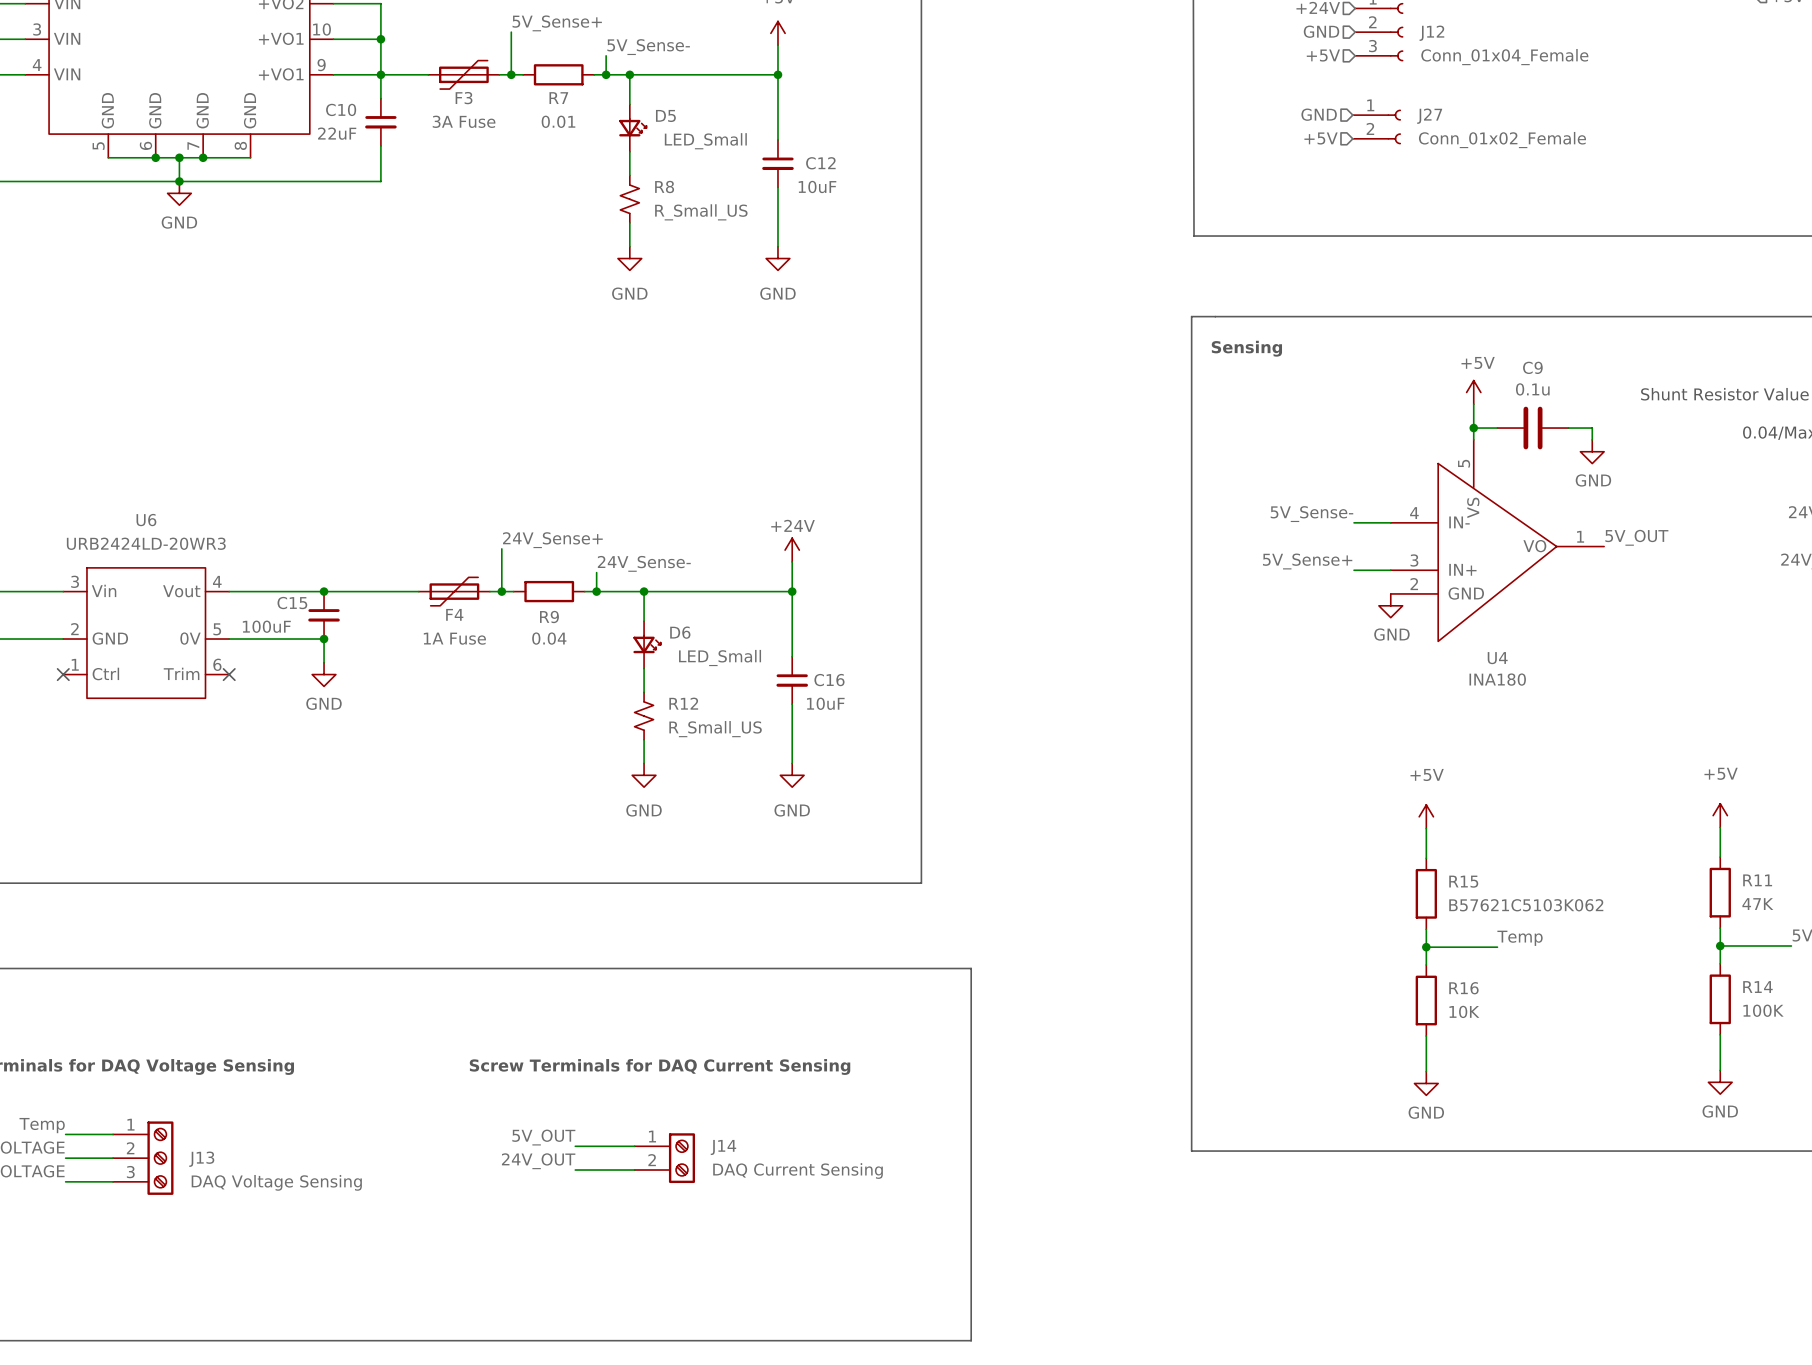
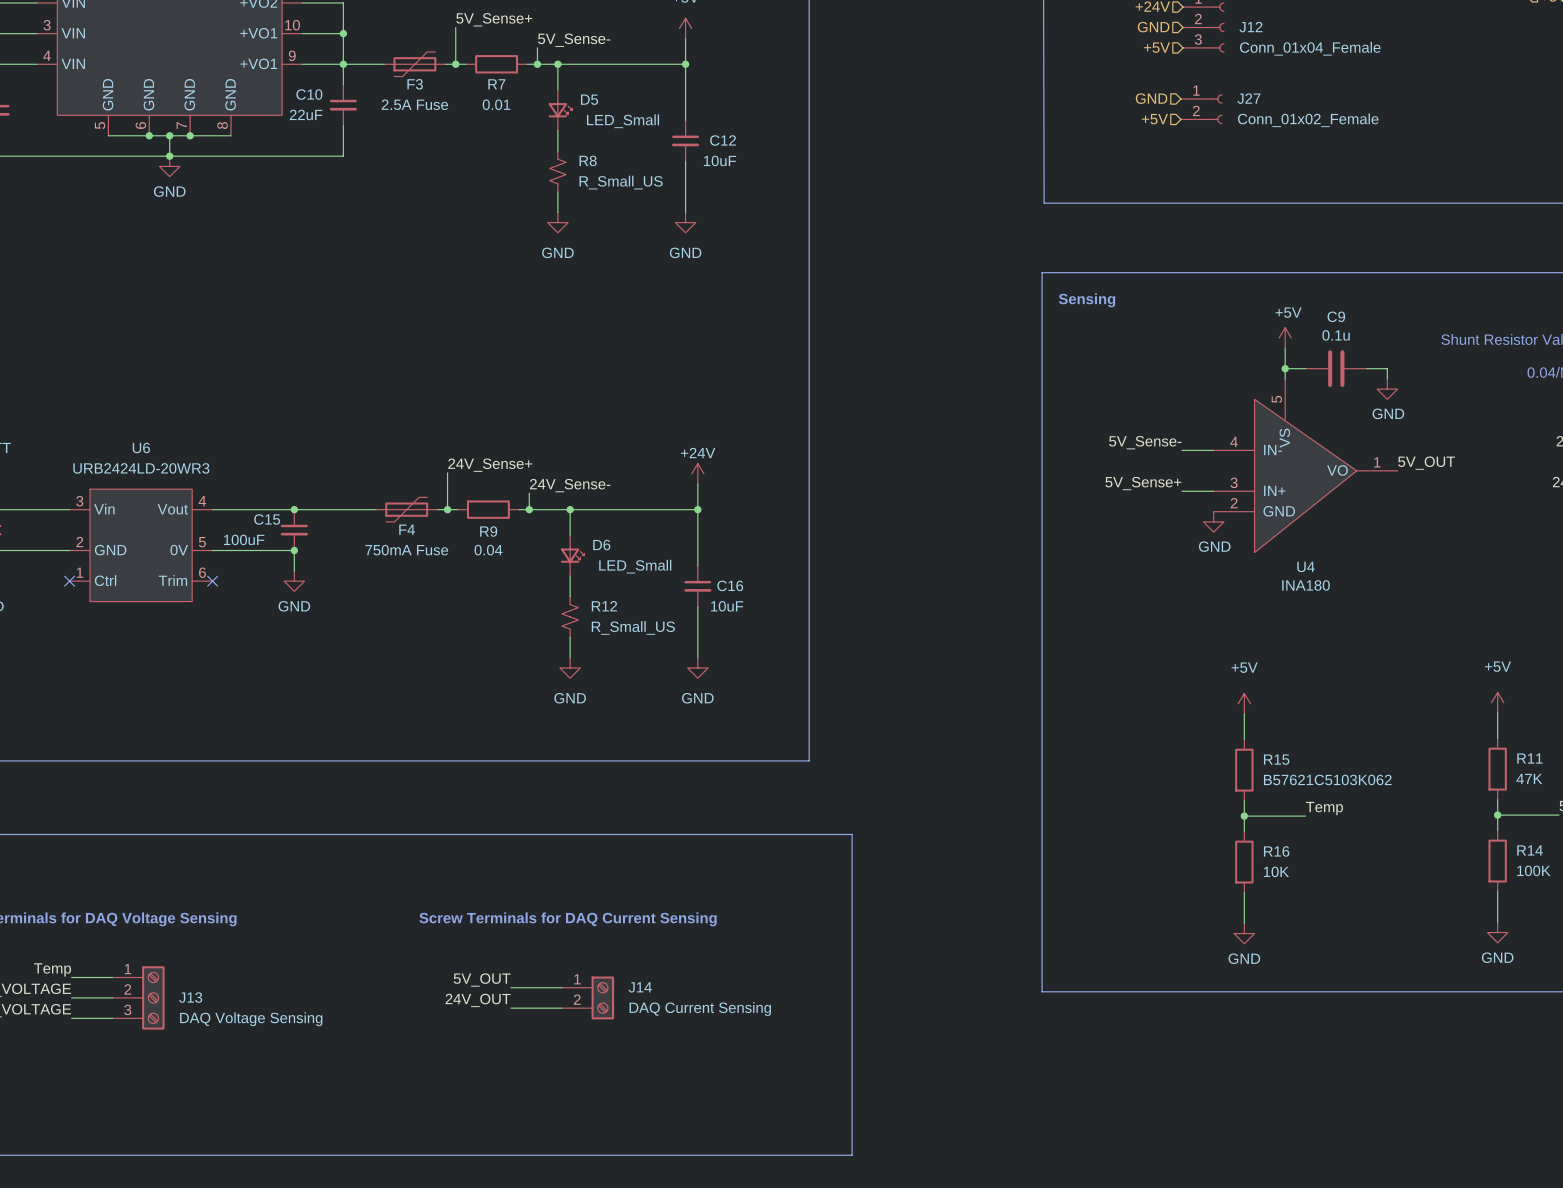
F3 value: 3A Fuse (464, 121) -> 2.5A Fuse (414, 104)
F4 value: 1A Fuse (454, 638) -> 750mA Fuse (406, 550)

